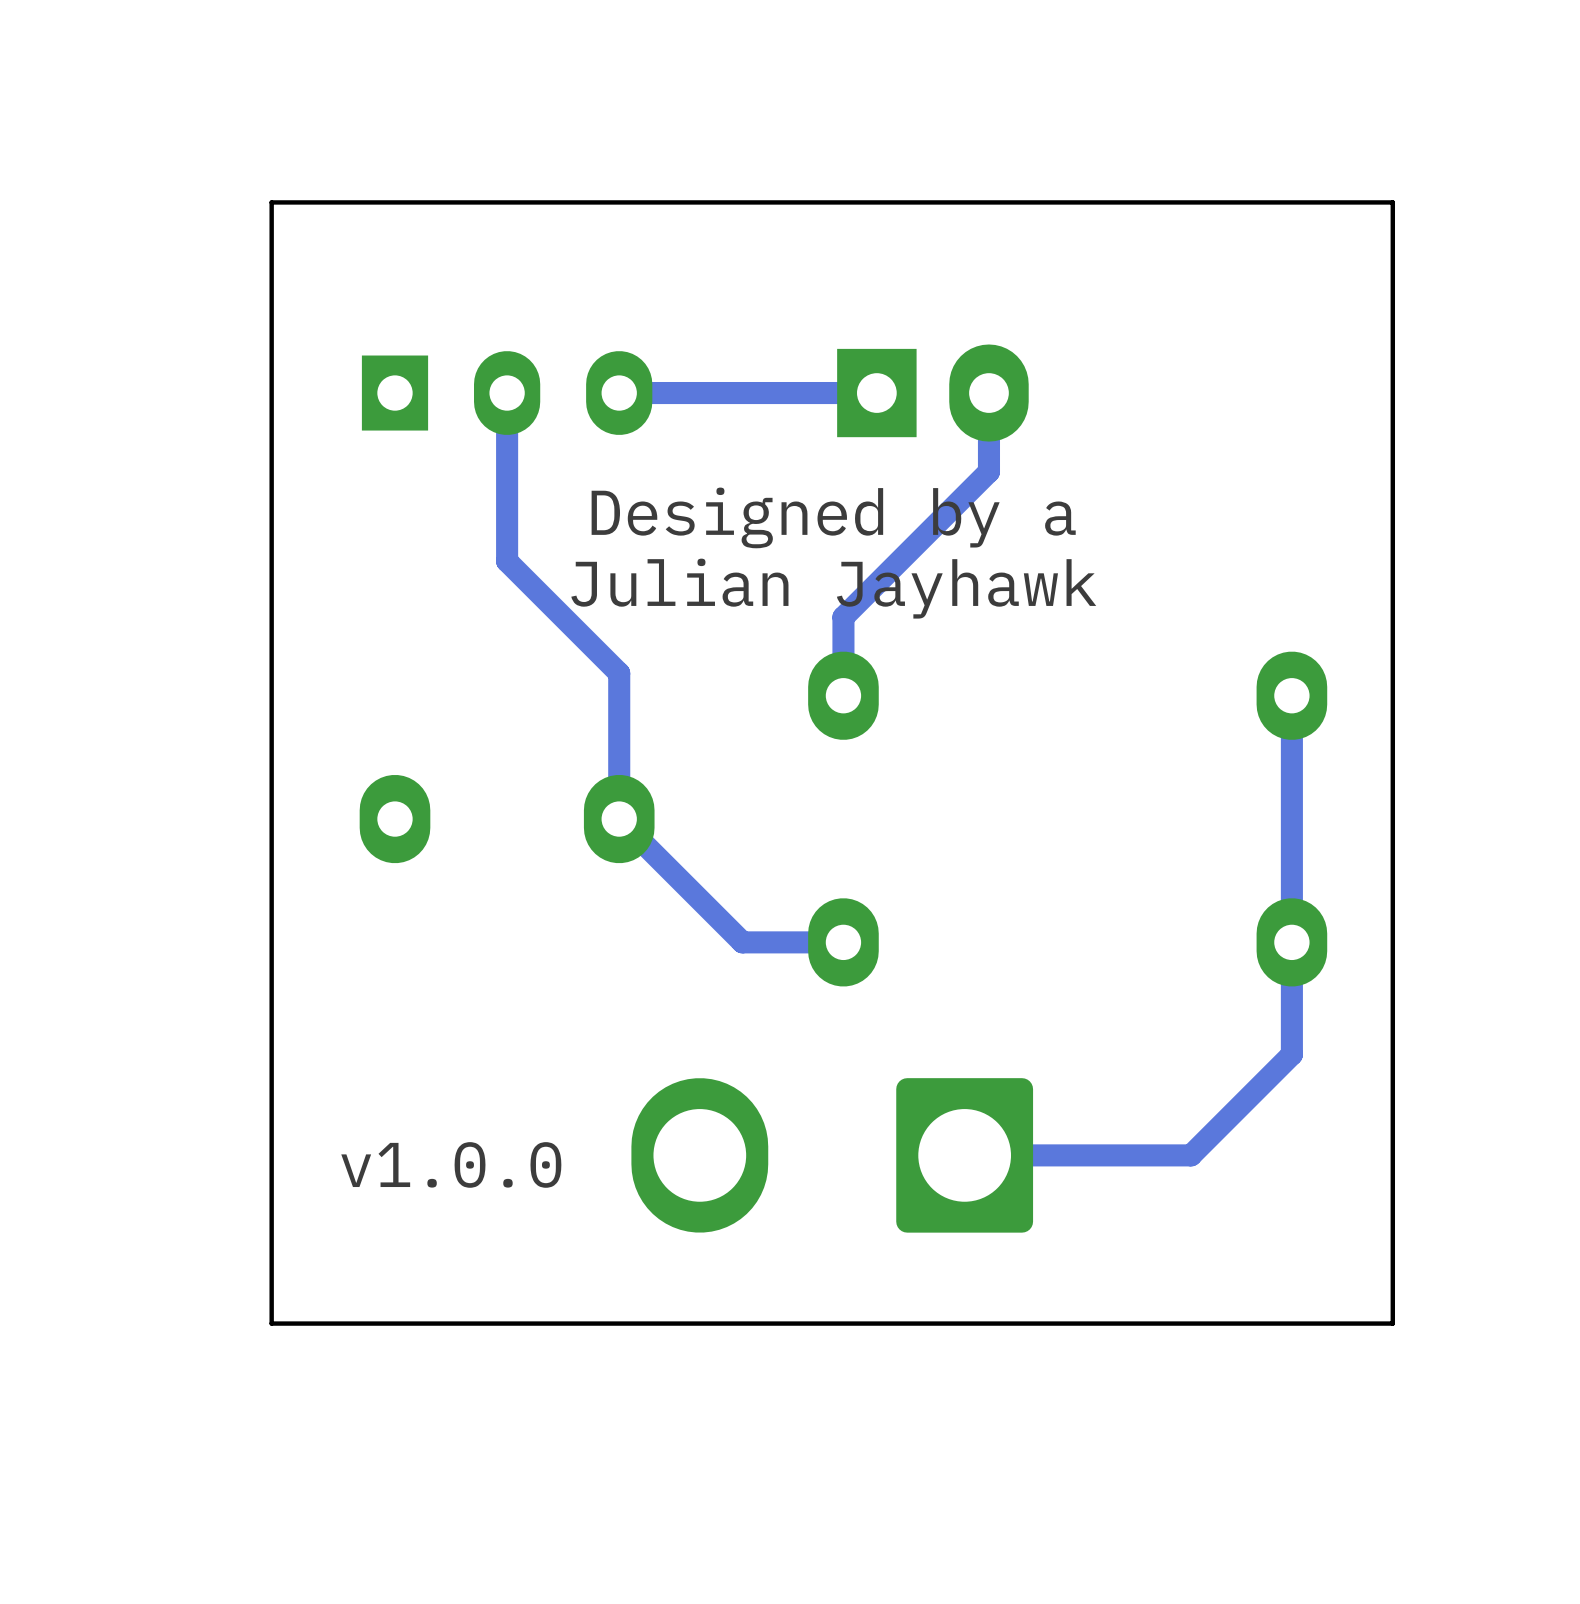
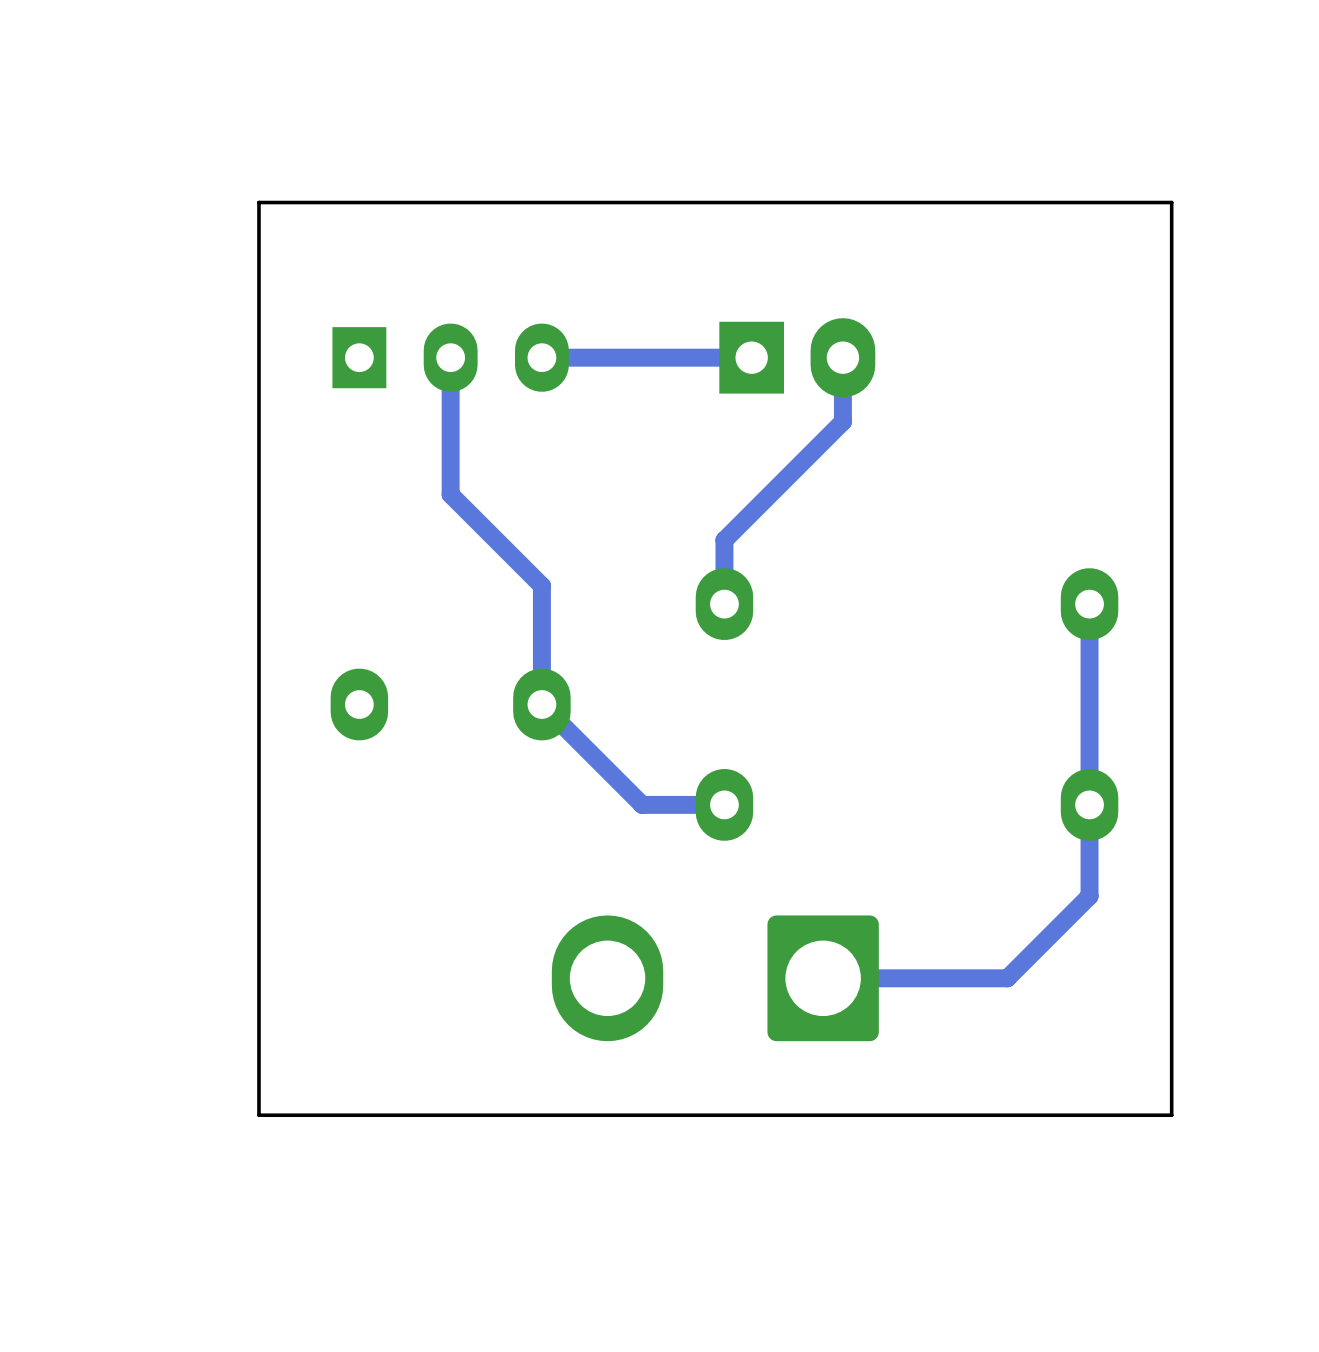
text: Designed by a (833, 517) -> none
text: Julian Jayhawk (833, 588) -> none
text: v1.0.0 (451, 1164) -> none

